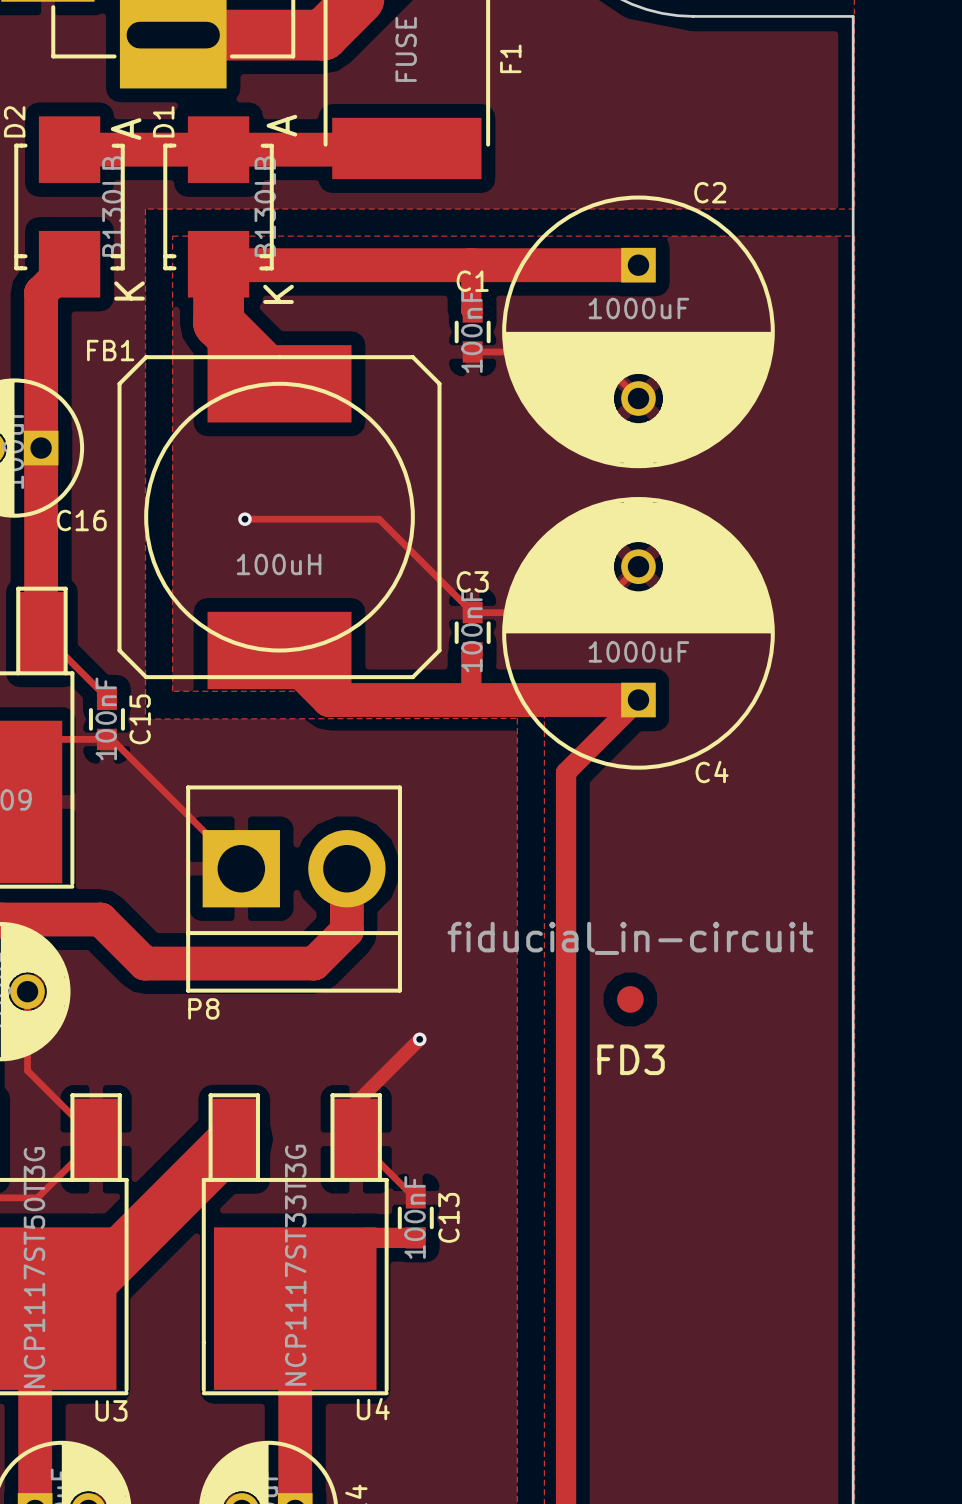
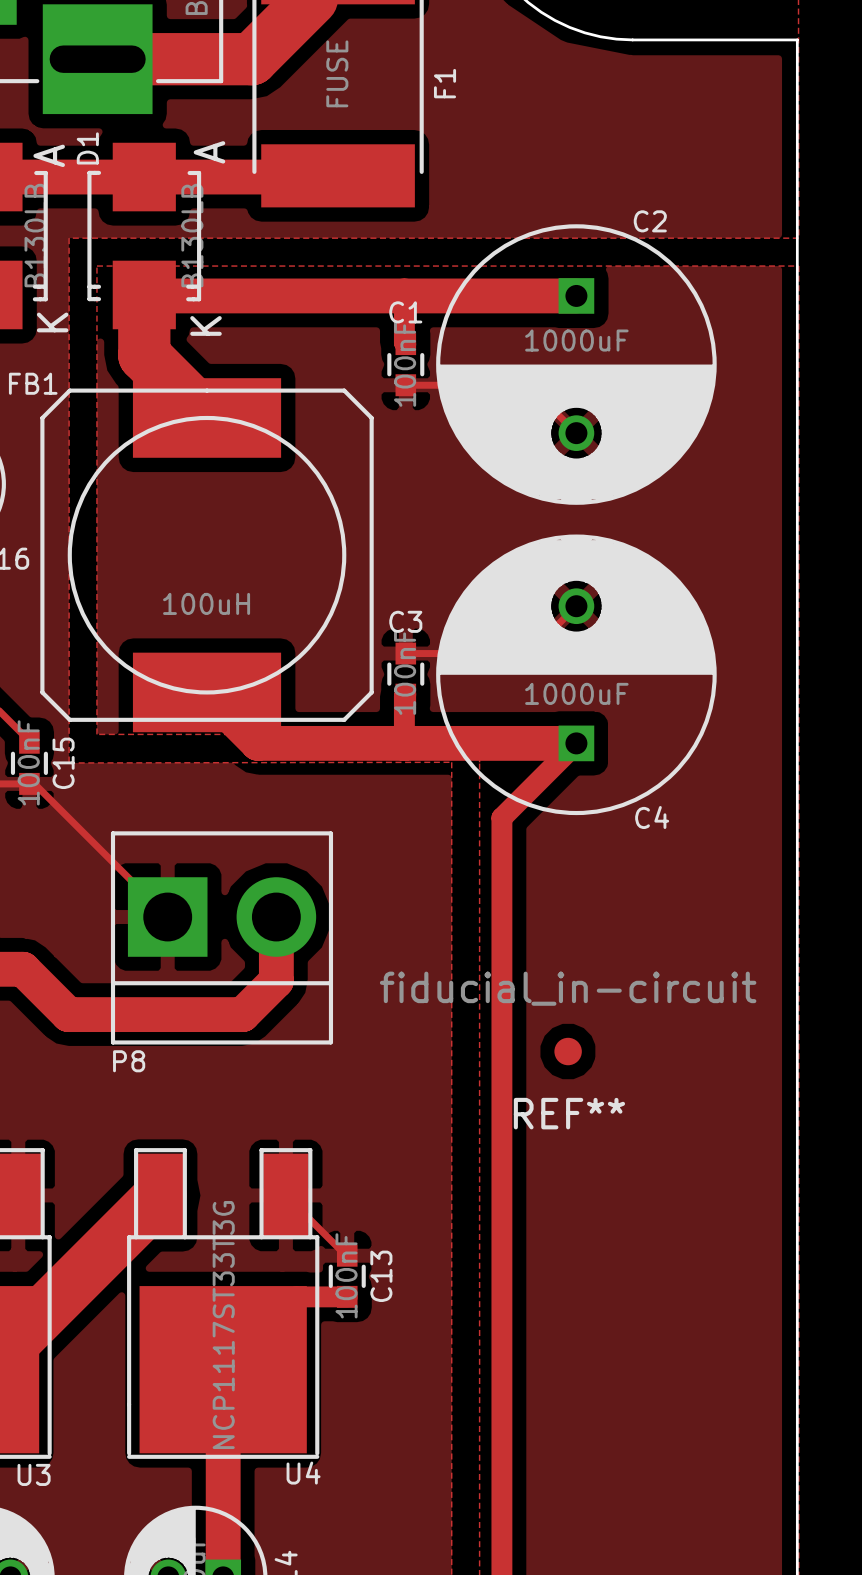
track: (244, 519) (379, 519) (472, 612) -> none
via: (244, 519) -> none
track: (419, 1039) (356, 1102) (356, 1139) -> none
via: (419, 1039) -> none
FD3 name: FD3 (631, 1059) -> REF** (569, 1113)

